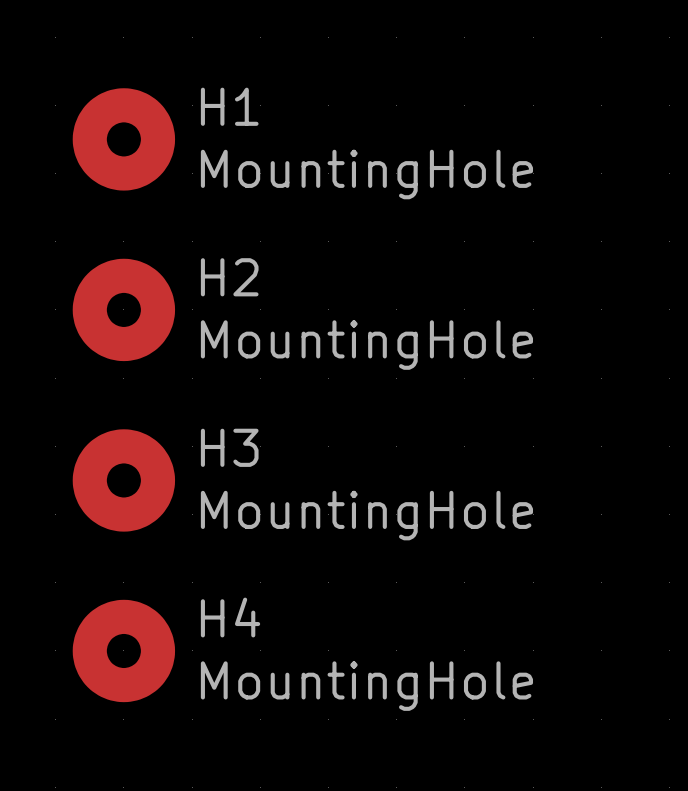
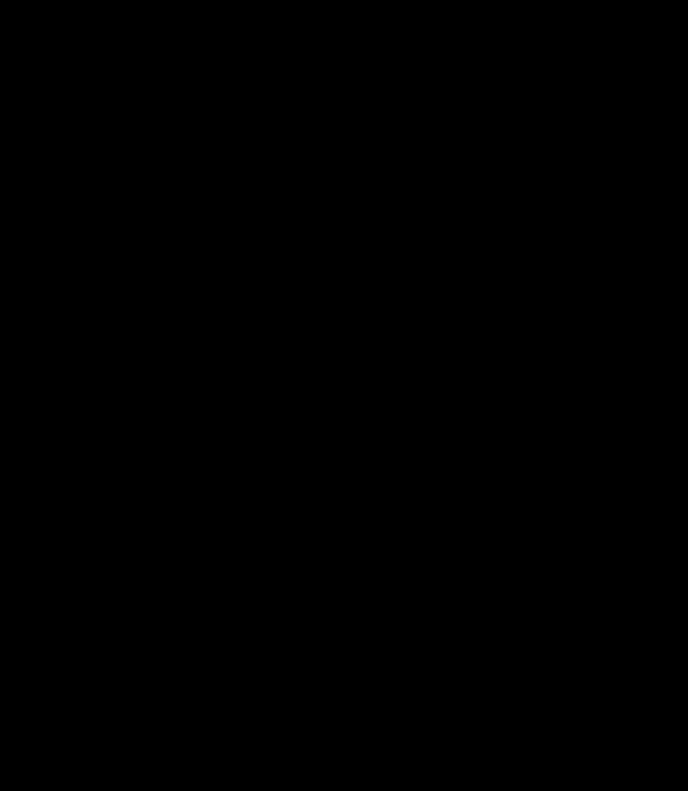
H1: MountingHole (123, 139) -> none
H2: MountingHole (123, 309) -> none
H3: MountingHole (123, 480) -> none
H4: MountingHole (123, 650) -> none

